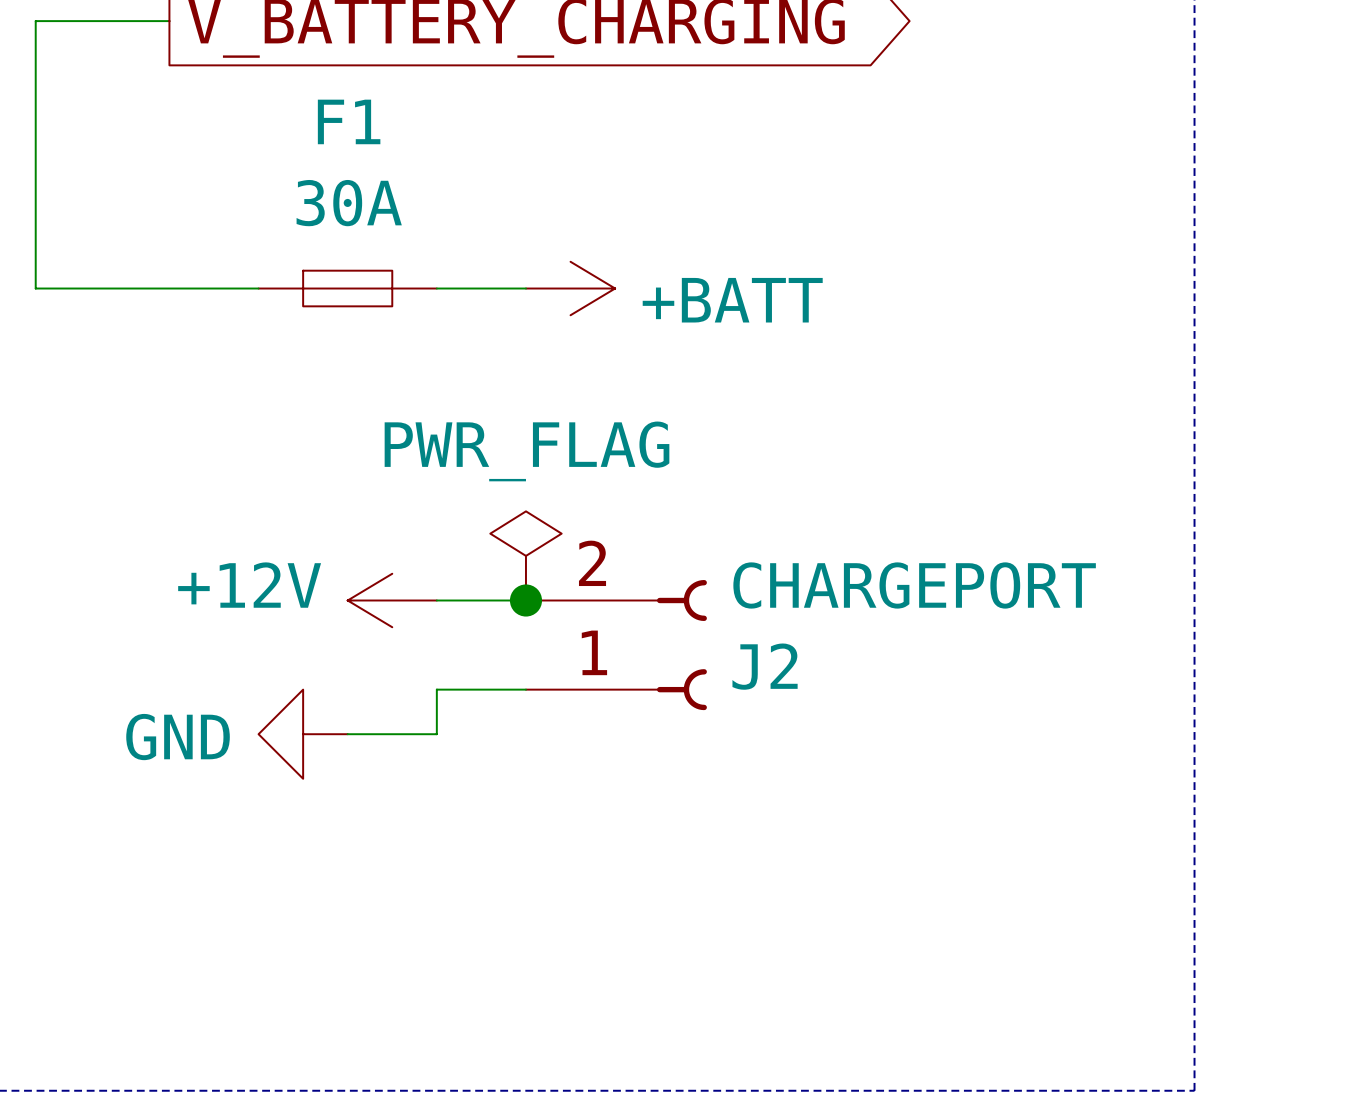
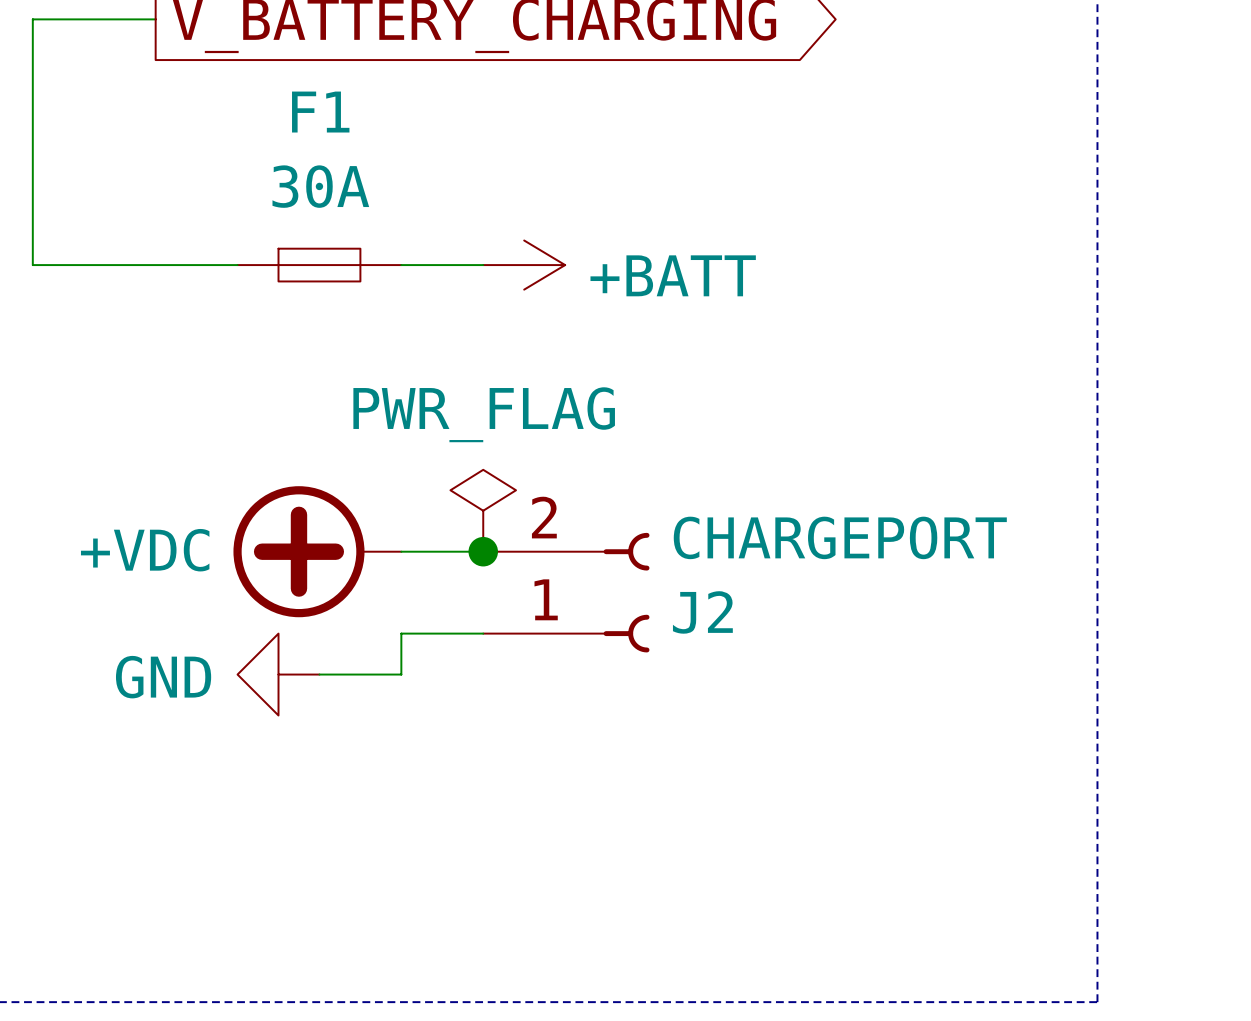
power symbol: none -> +VDC (317, 551)
power symbol: +12V (392, 600) -> none

